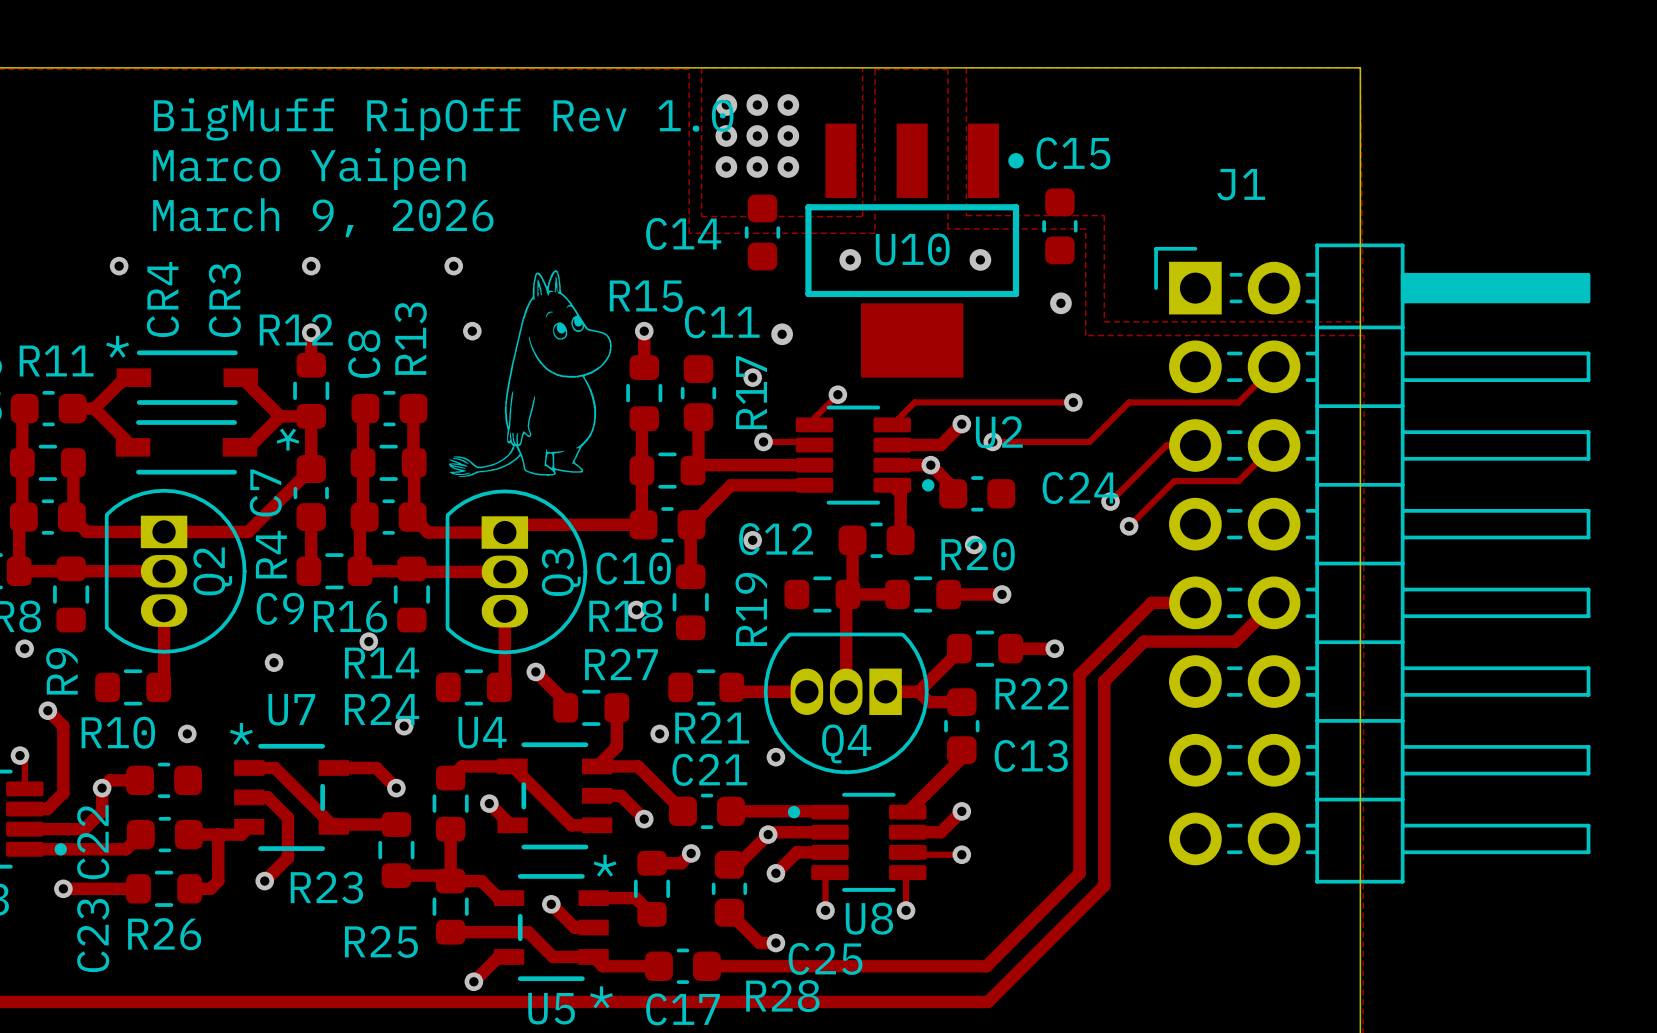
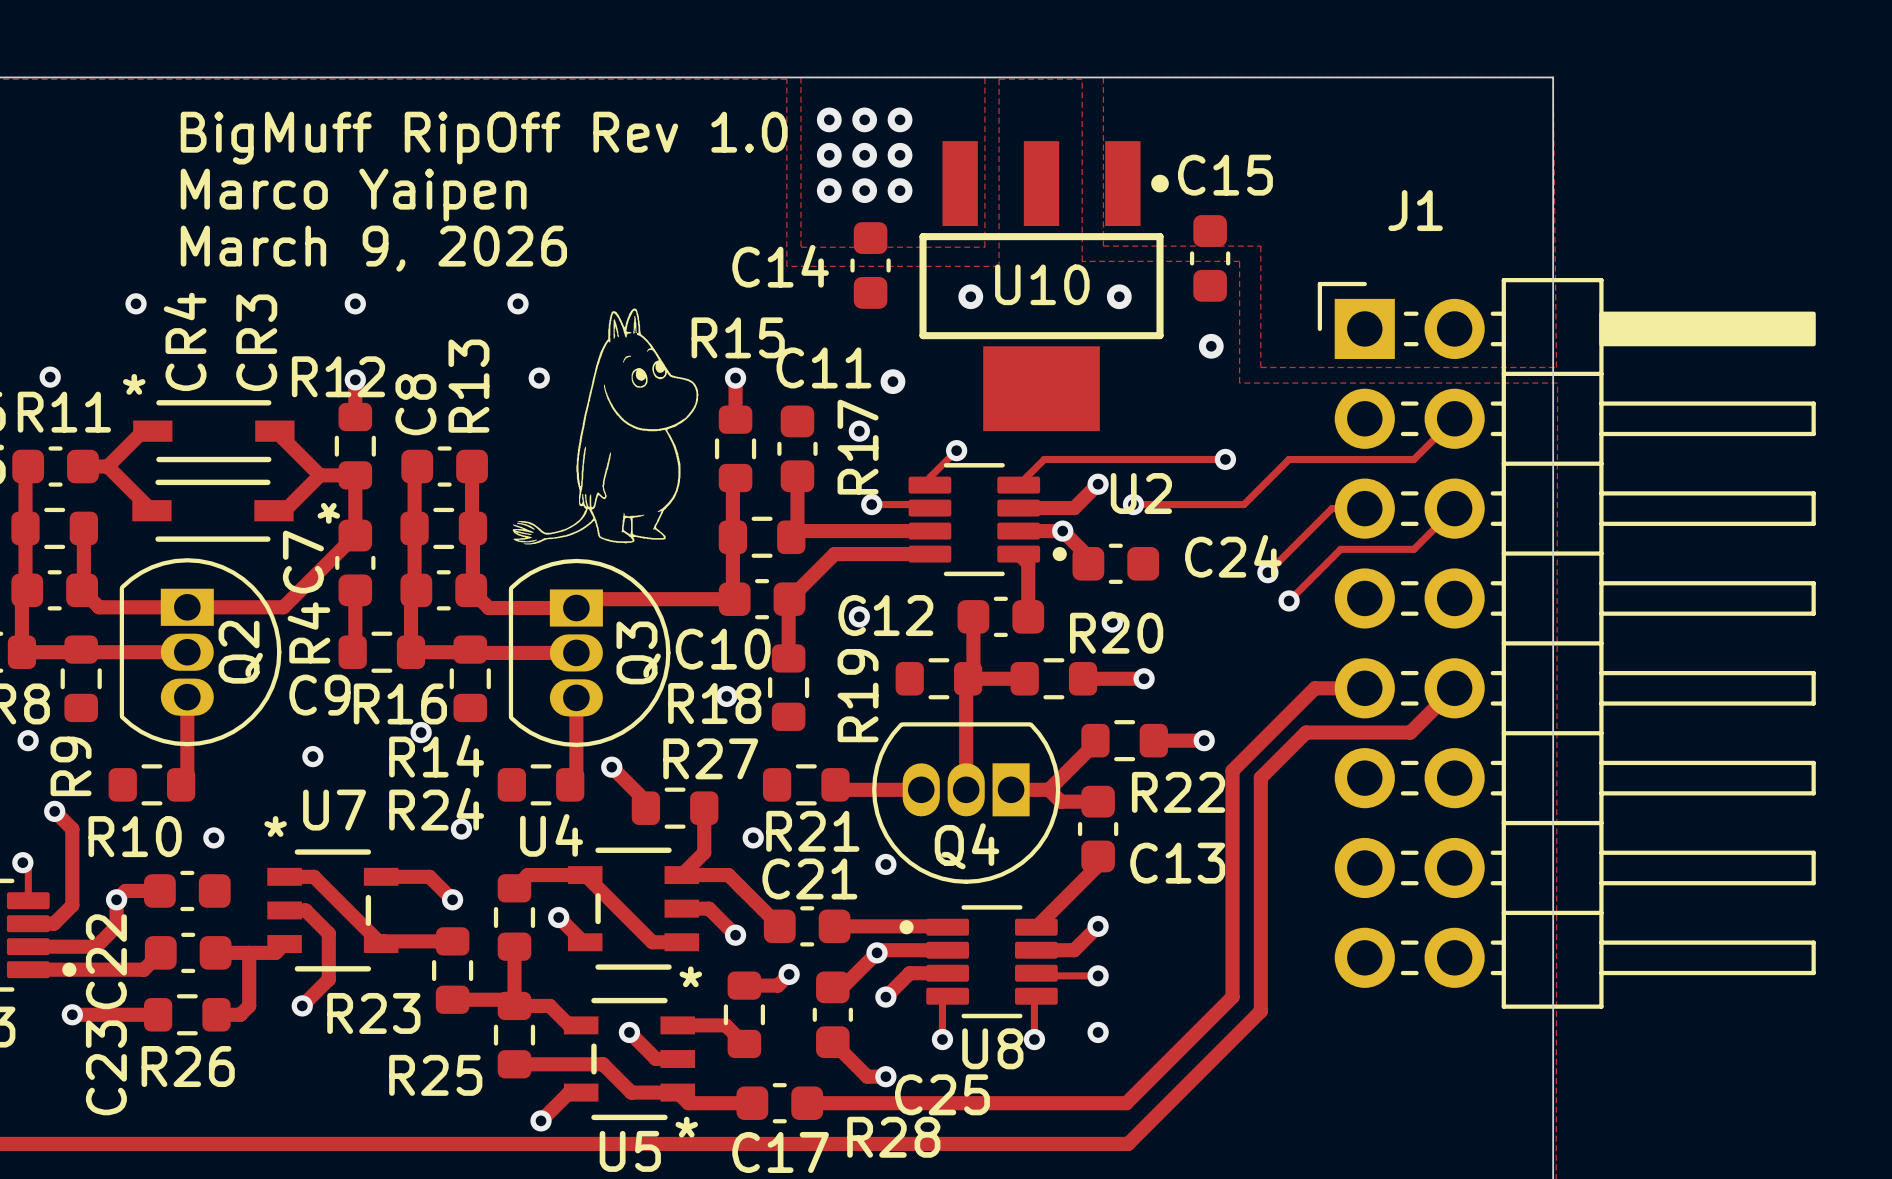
via: none -> (50, 377)
via: none -> (1098, 1032)

